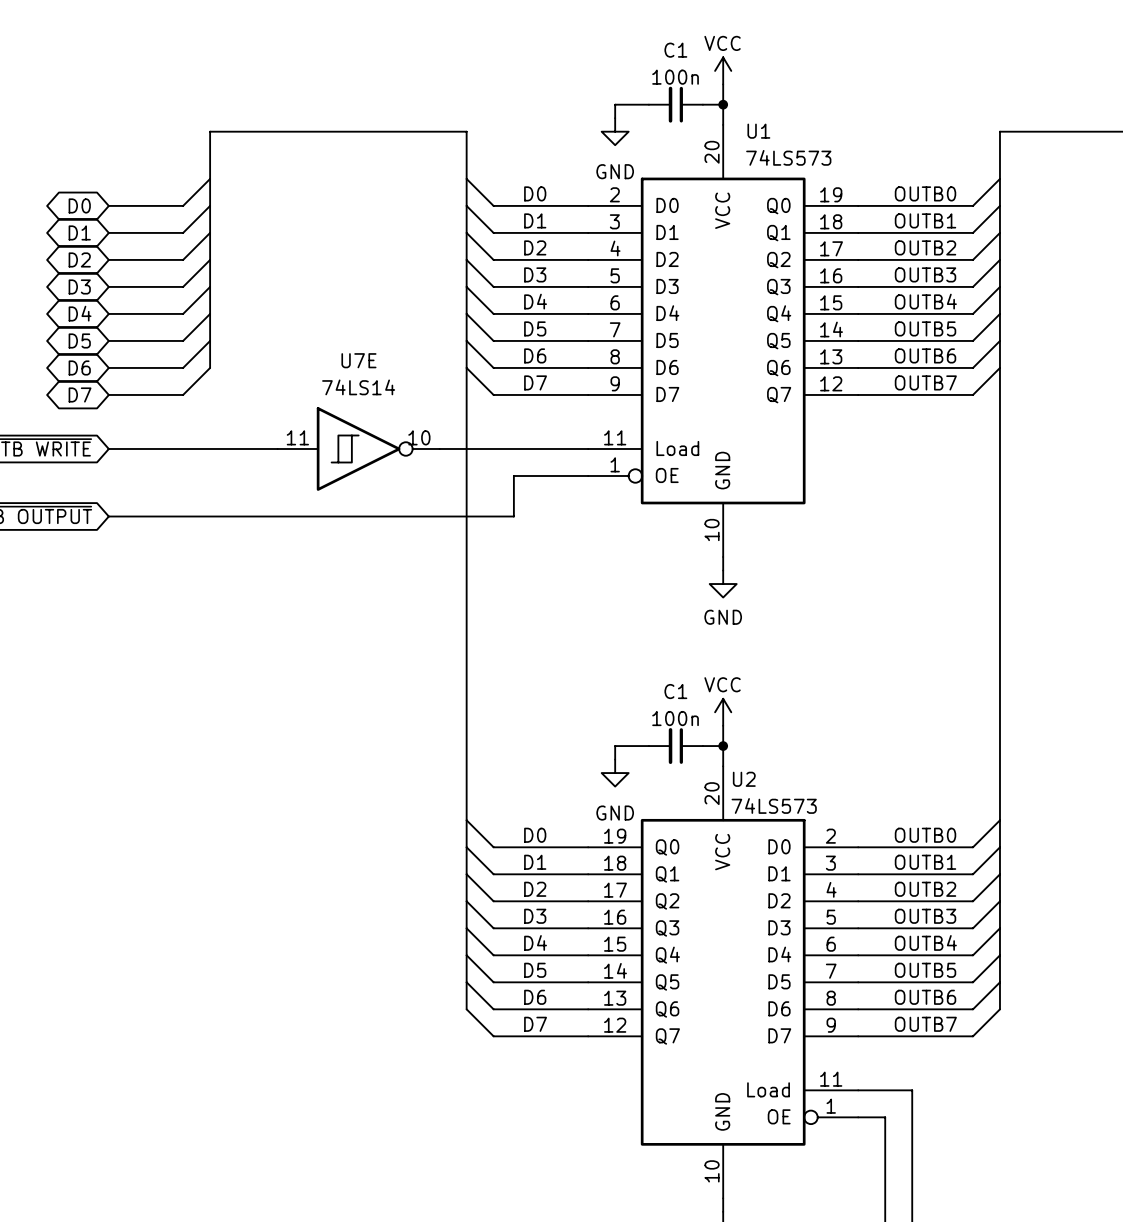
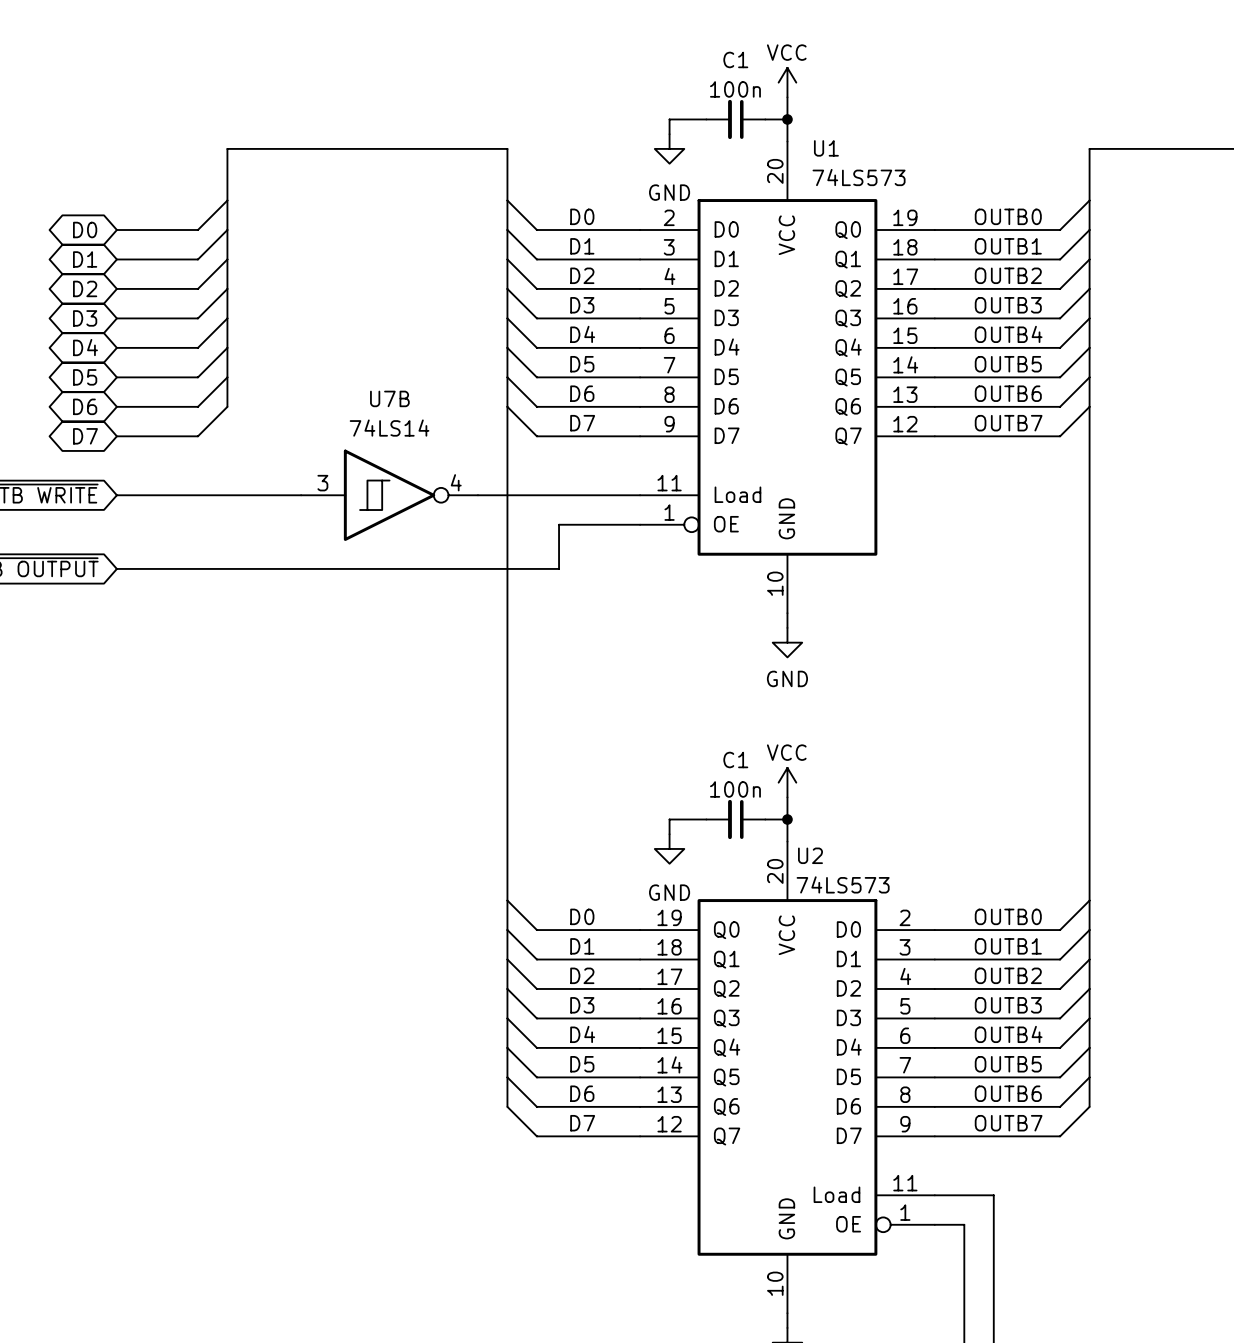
U7E name: U7E (358, 360) -> U7B (389, 398)
U7E pin number: 11 (297, 437) -> 3 (322, 483)
U7E pin number: 10 (419, 437) -> 4 (456, 482)

